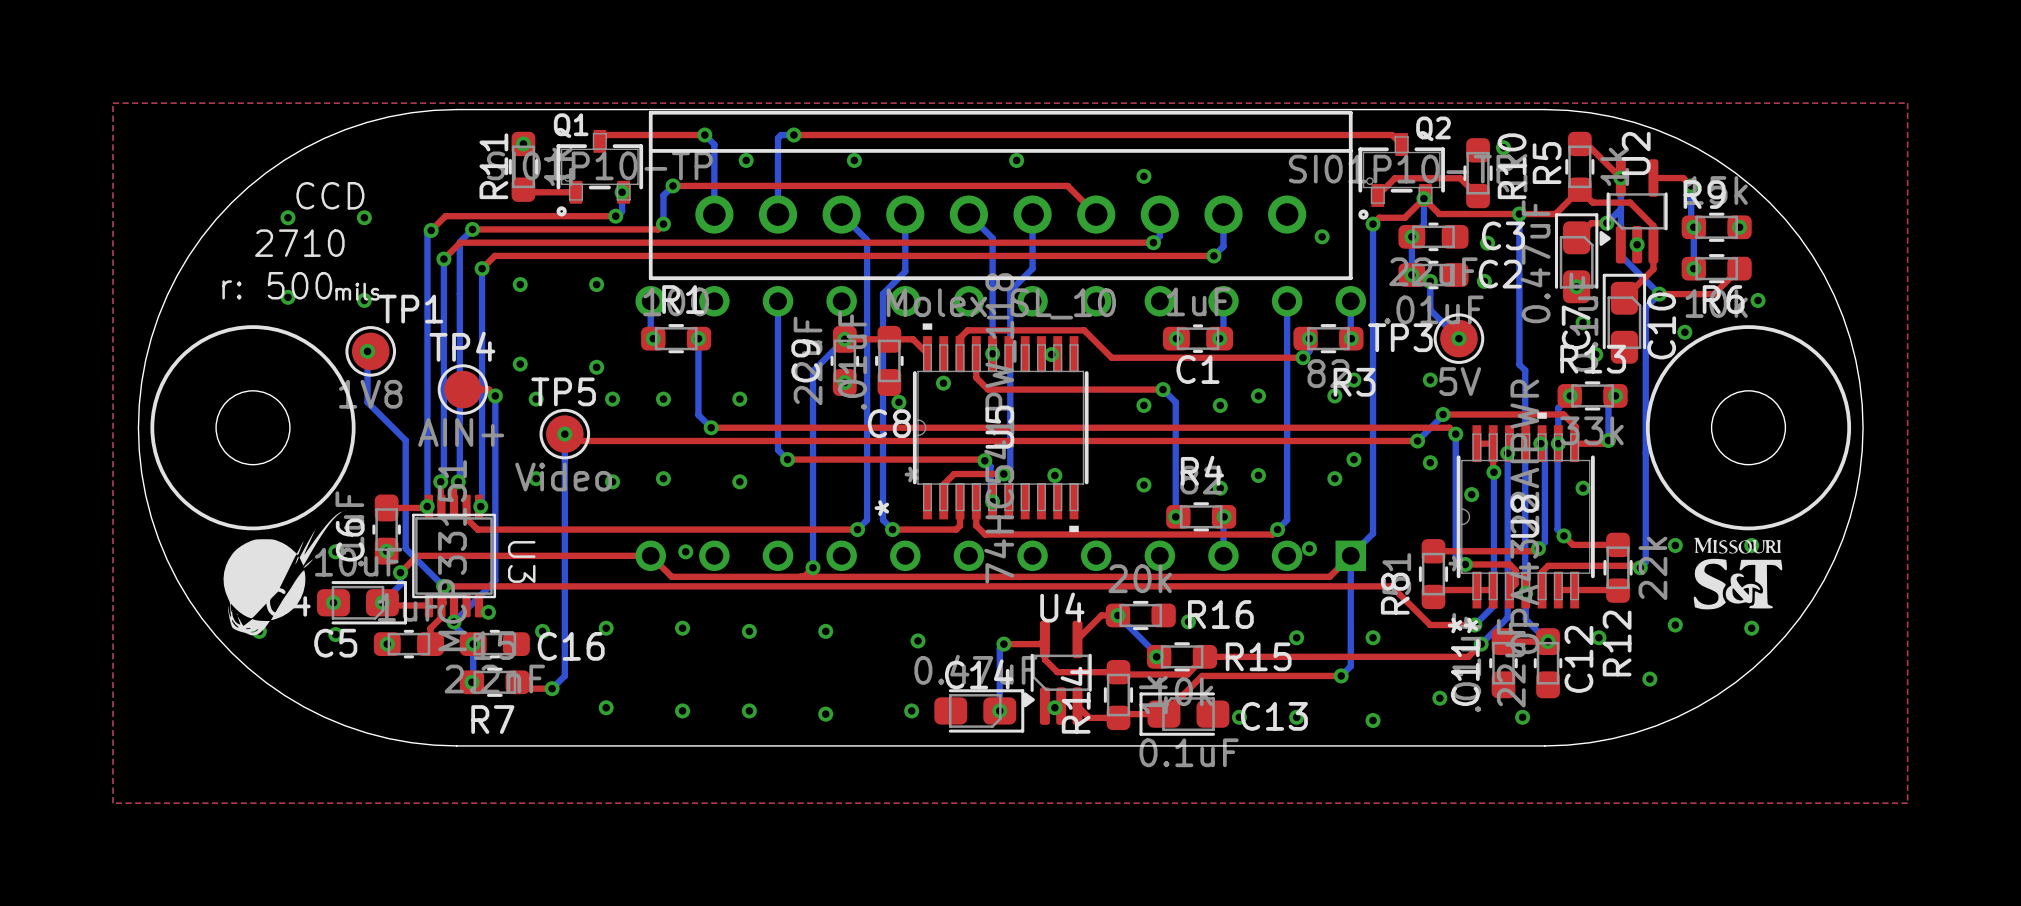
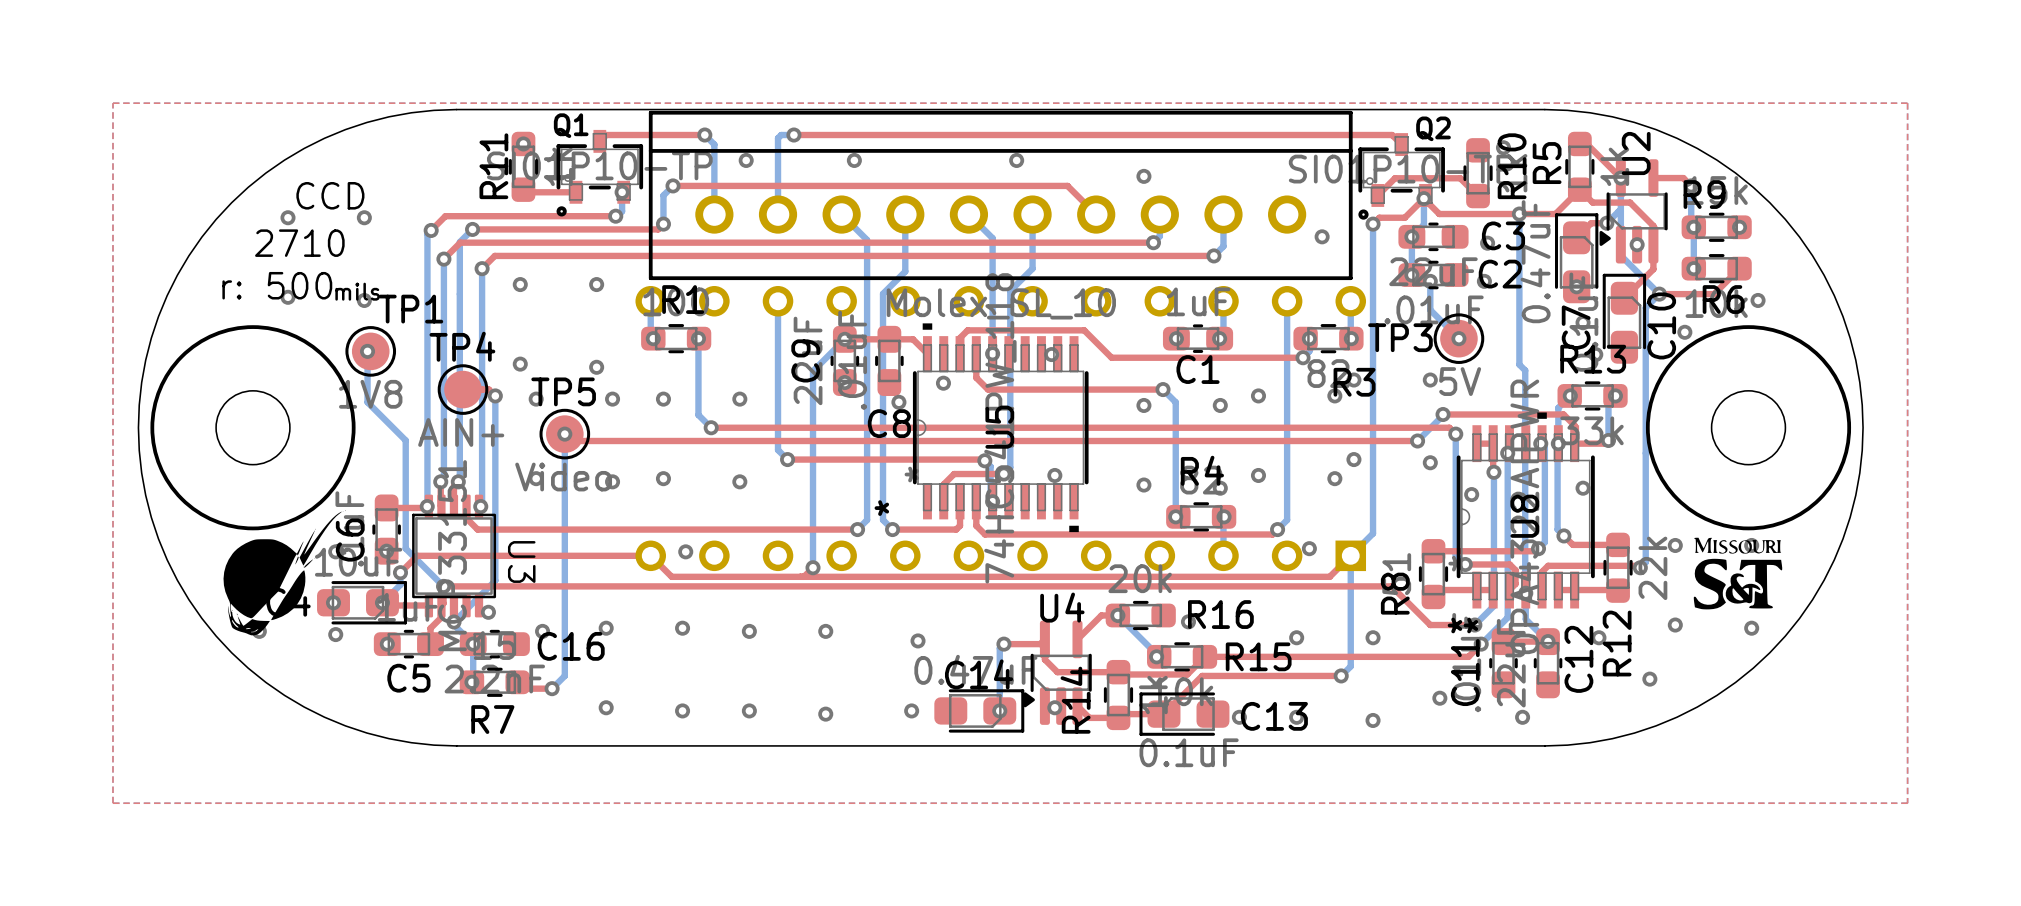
C5 name position: C5 (335, 643) -> C5 (408, 678)

